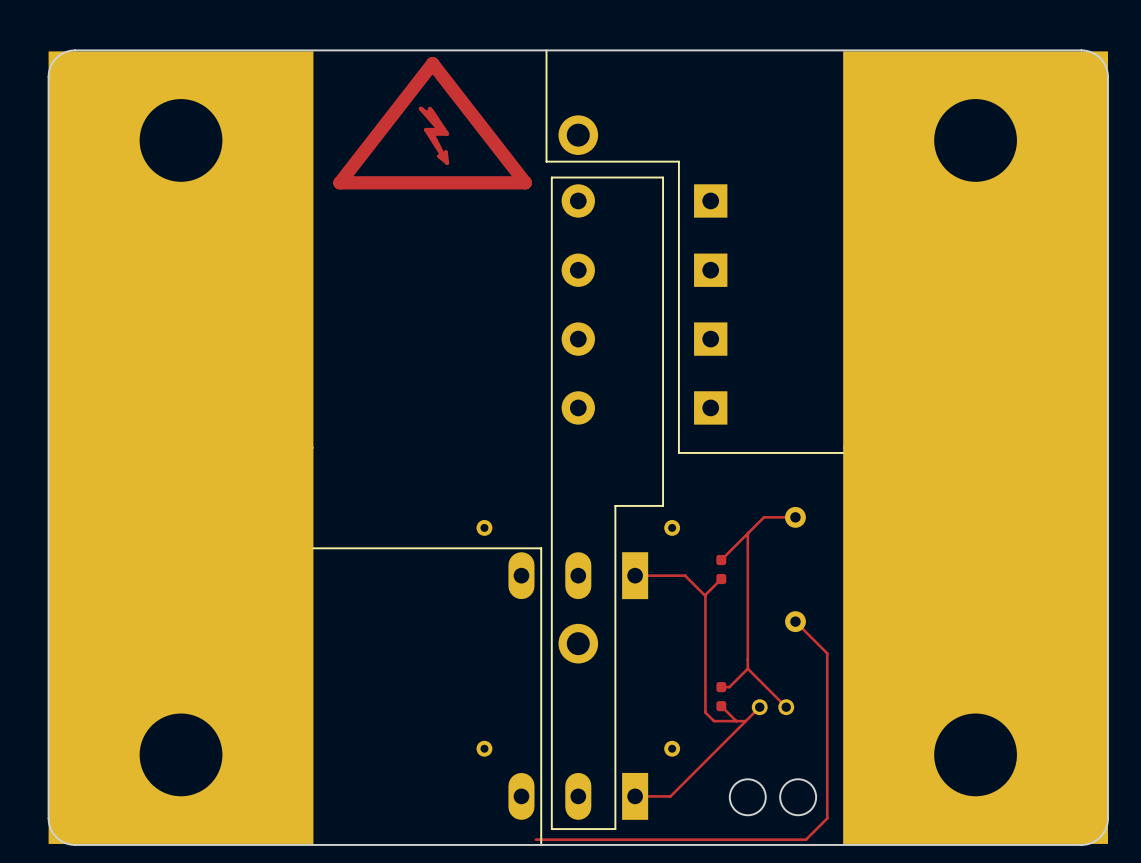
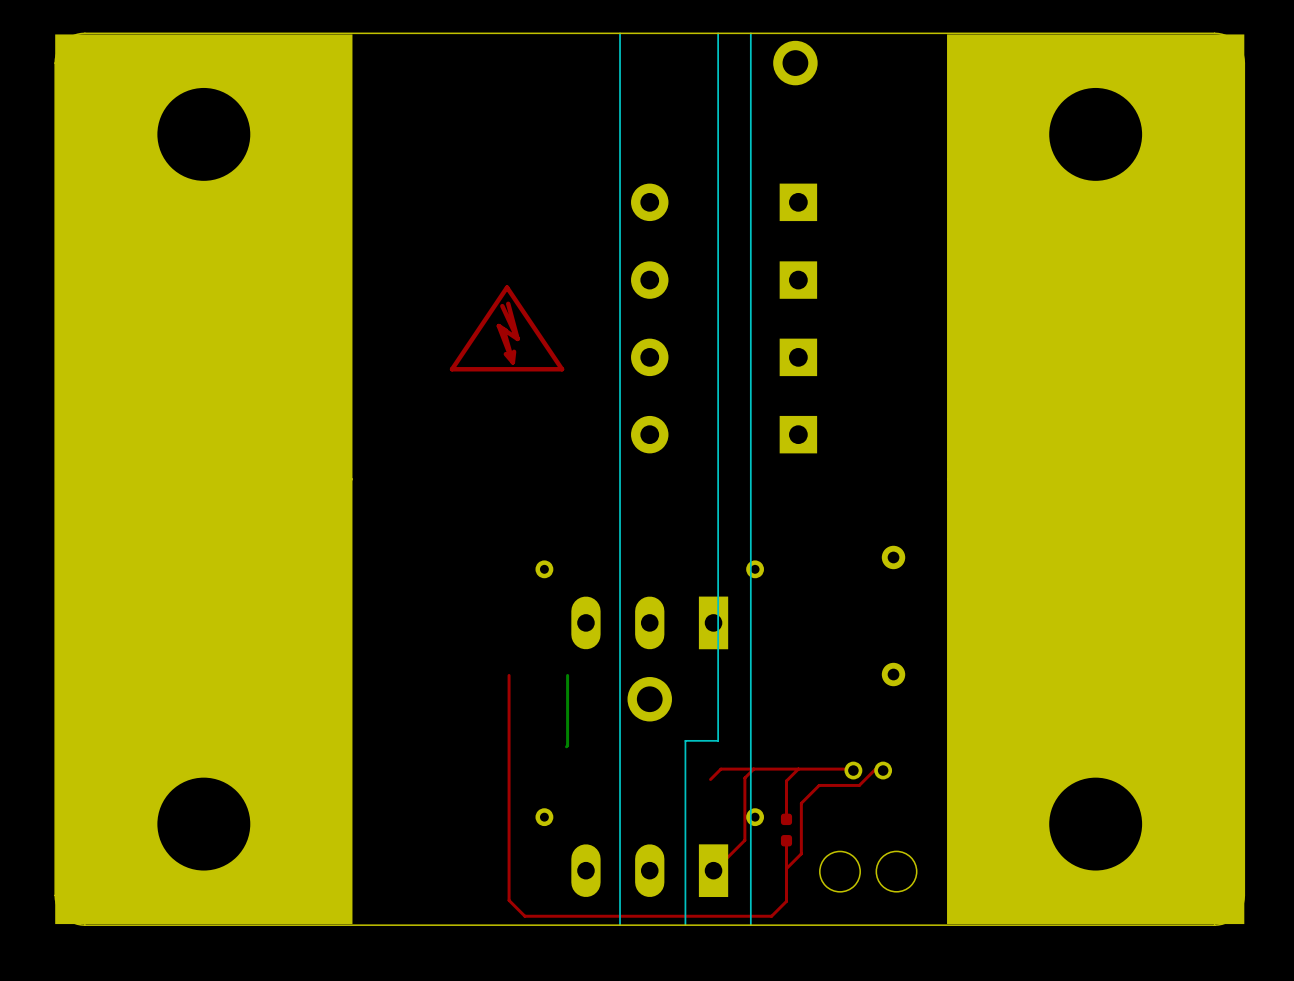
line: (546, 50) (546, 161) (678, 161) (678, 452) (843, 452) -> none
line: none -> (620, 33) (620, 176)
line: none -> (718, 33) (718, 740) (685, 740) (685, 925)
line: none -> (750, 33) (750, 925)
drawing: [333, 57, 532, 190] -> none
part position: (578, 135) -> (795, 63)
line: (551, 177) (663, 177) (663, 505) (615, 505) (615, 829) (551, 829) -> (620, 925) (620, 907)
drawing: none -> [449, 285, 565, 372]
top track: (795, 517) (763, 517) (721, 559) -> none
top track: (747, 533) (747, 668) -> none
line: (313, 548) (541, 548) (541, 844) -> none
part: (721, 569) -> none
top track: (635, 575) (685, 575) (705, 595) -> none
top track: (721, 579) (705, 594) (705, 712) (714, 721) (745, 721) -> none
top track: (795, 621) (827, 653) (827, 818) (806, 839) (535, 839) -> none
top track: none -> (509, 675) (509, 900) (524, 916) (771, 916) (786, 901) (786, 840)
bottom track: none -> (567, 675) (566, 746)
top track: (747, 668) (786, 707) -> none
top track: (747, 668) (729, 687) (721, 687) -> none
part position: (721, 696) -> (786, 830)
top track: none -> (753, 769) (744, 778) (744, 840) (710, 874)
top track: none -> (798, 769) (786, 780) (786, 819)
top track: none -> (845, 769) (720, 769) (710, 779)
top track: none -> (875, 769) (859, 785) (819, 785) (801, 803) (801, 853) (786, 868)
top track: (721, 706) (736, 721) -> none
top track: (759, 707) (670, 796) (635, 796) -> none

